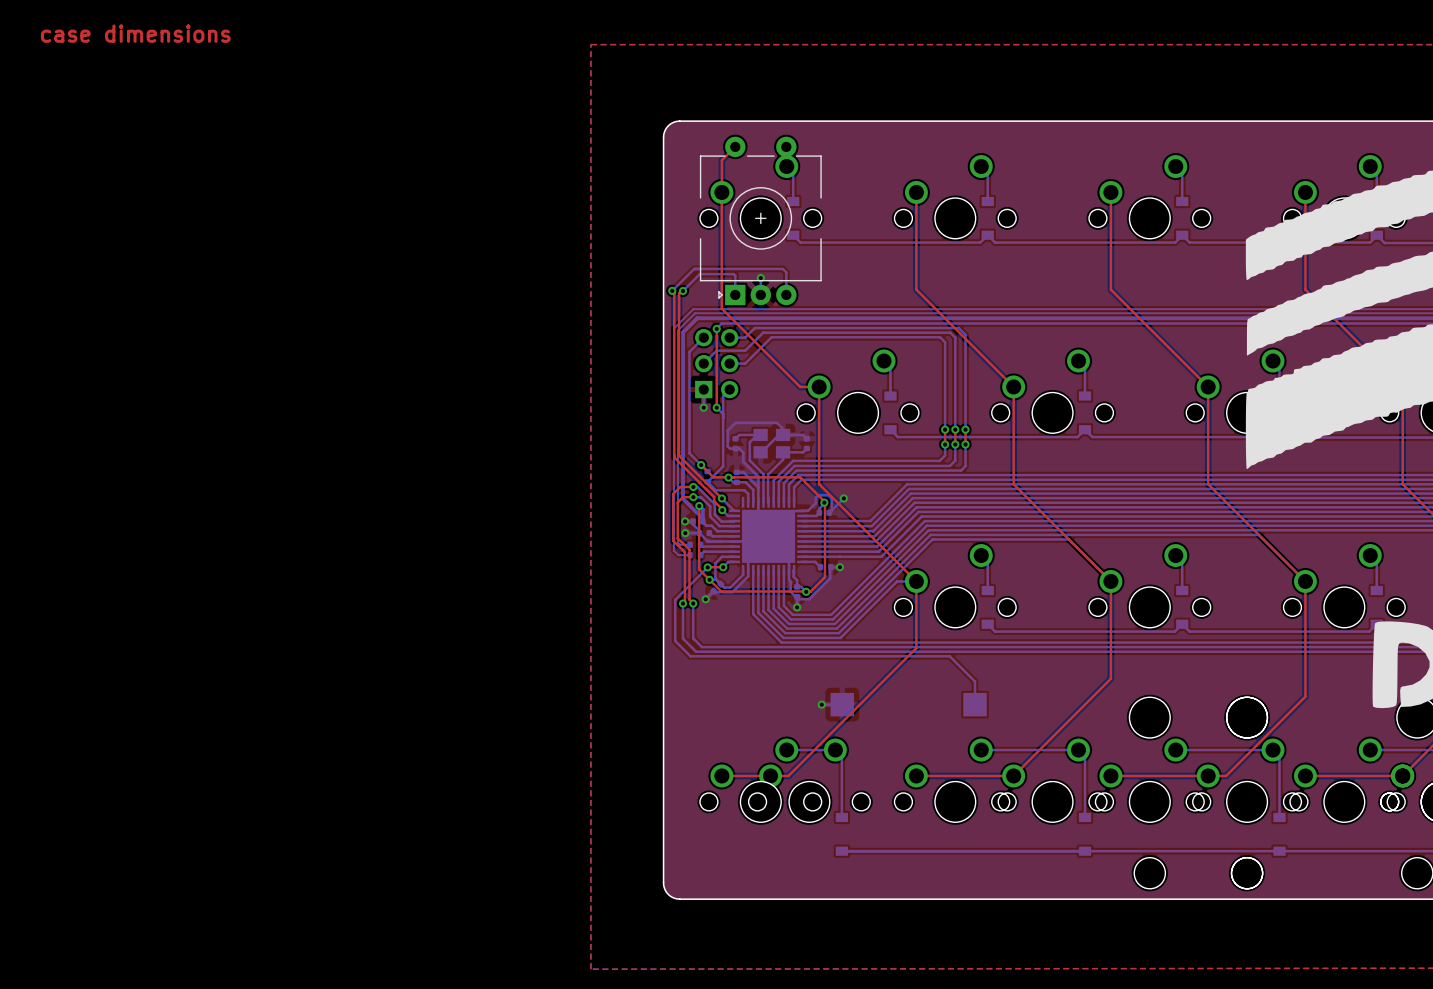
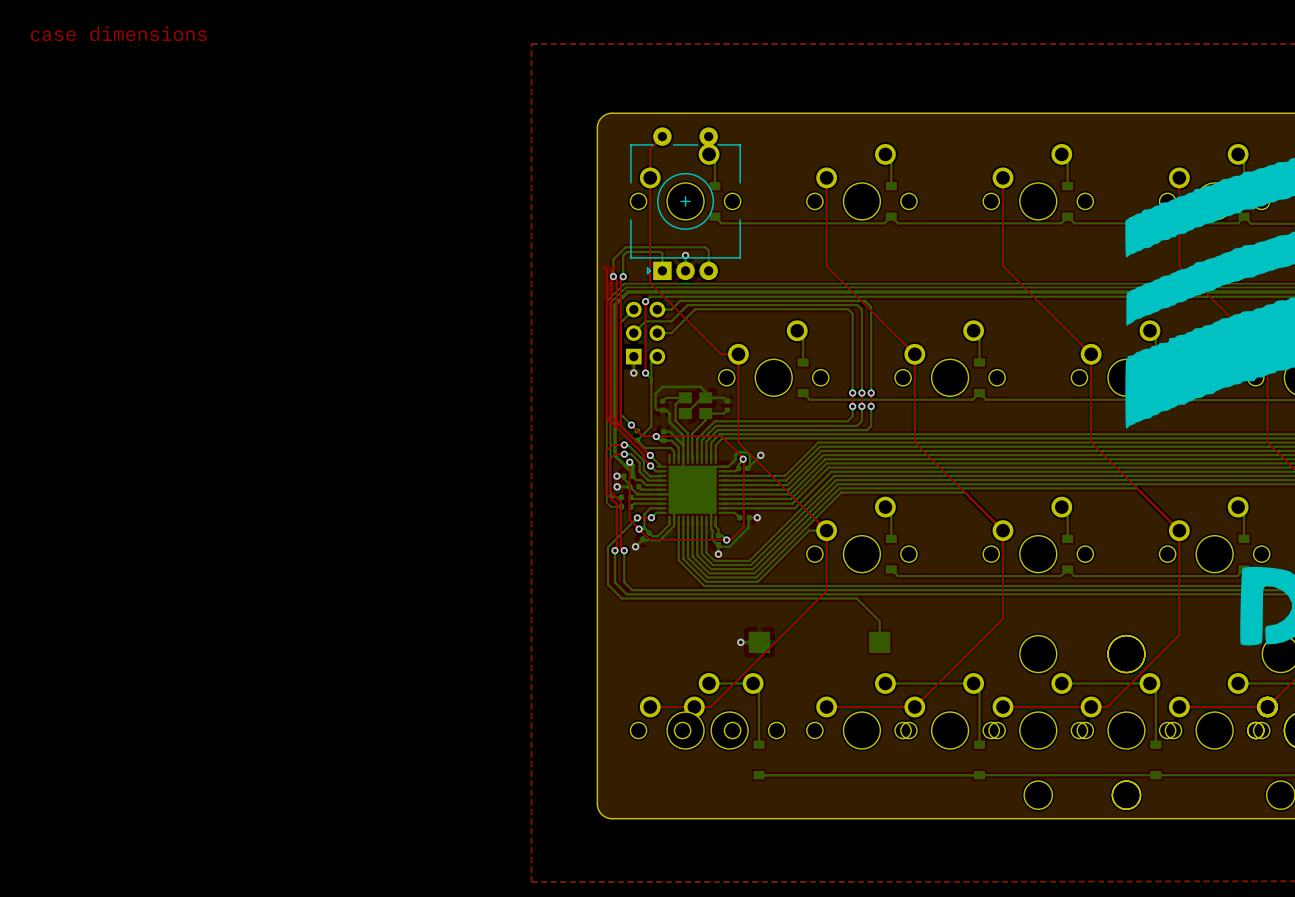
bottom track: (694, 268) (672, 290) -> (625, 247) (613, 259) (613, 276)
bottom track: (699, 274) (683, 290) -> (630, 251) (626, 251) (623, 255) (623, 276)
via: (672, 290) -> none
via: (683, 290) -> none
via: none -> (613, 276)
via: none -> (623, 276)
top track: none -> (620, 279) (620, 426)
top track: none -> (616, 279) (616, 427)

